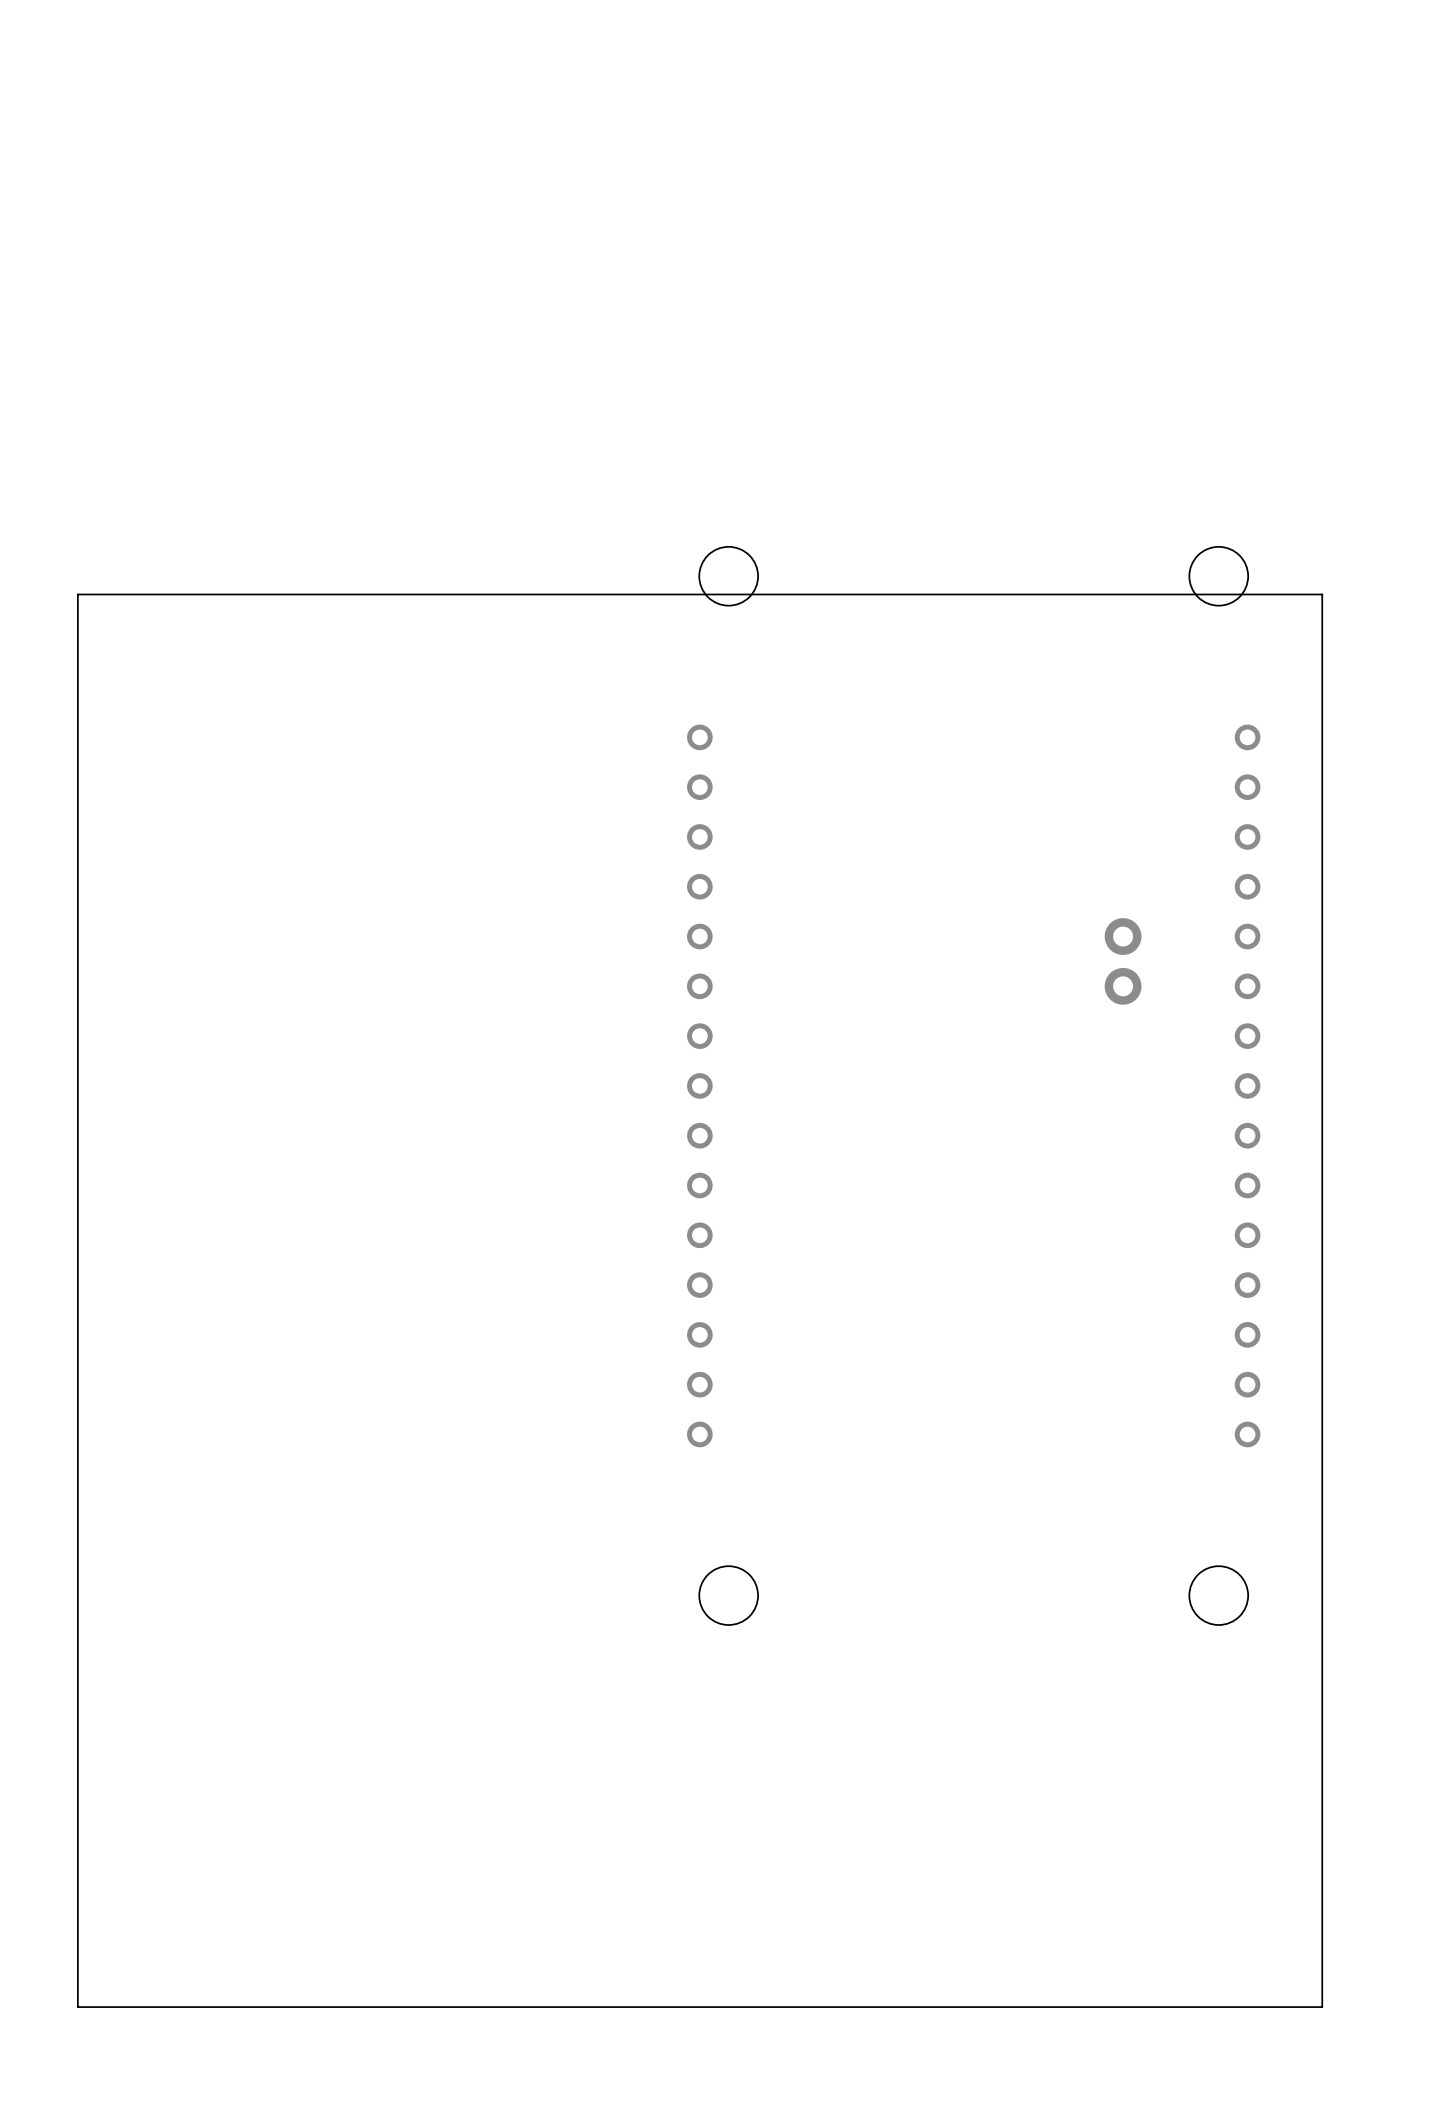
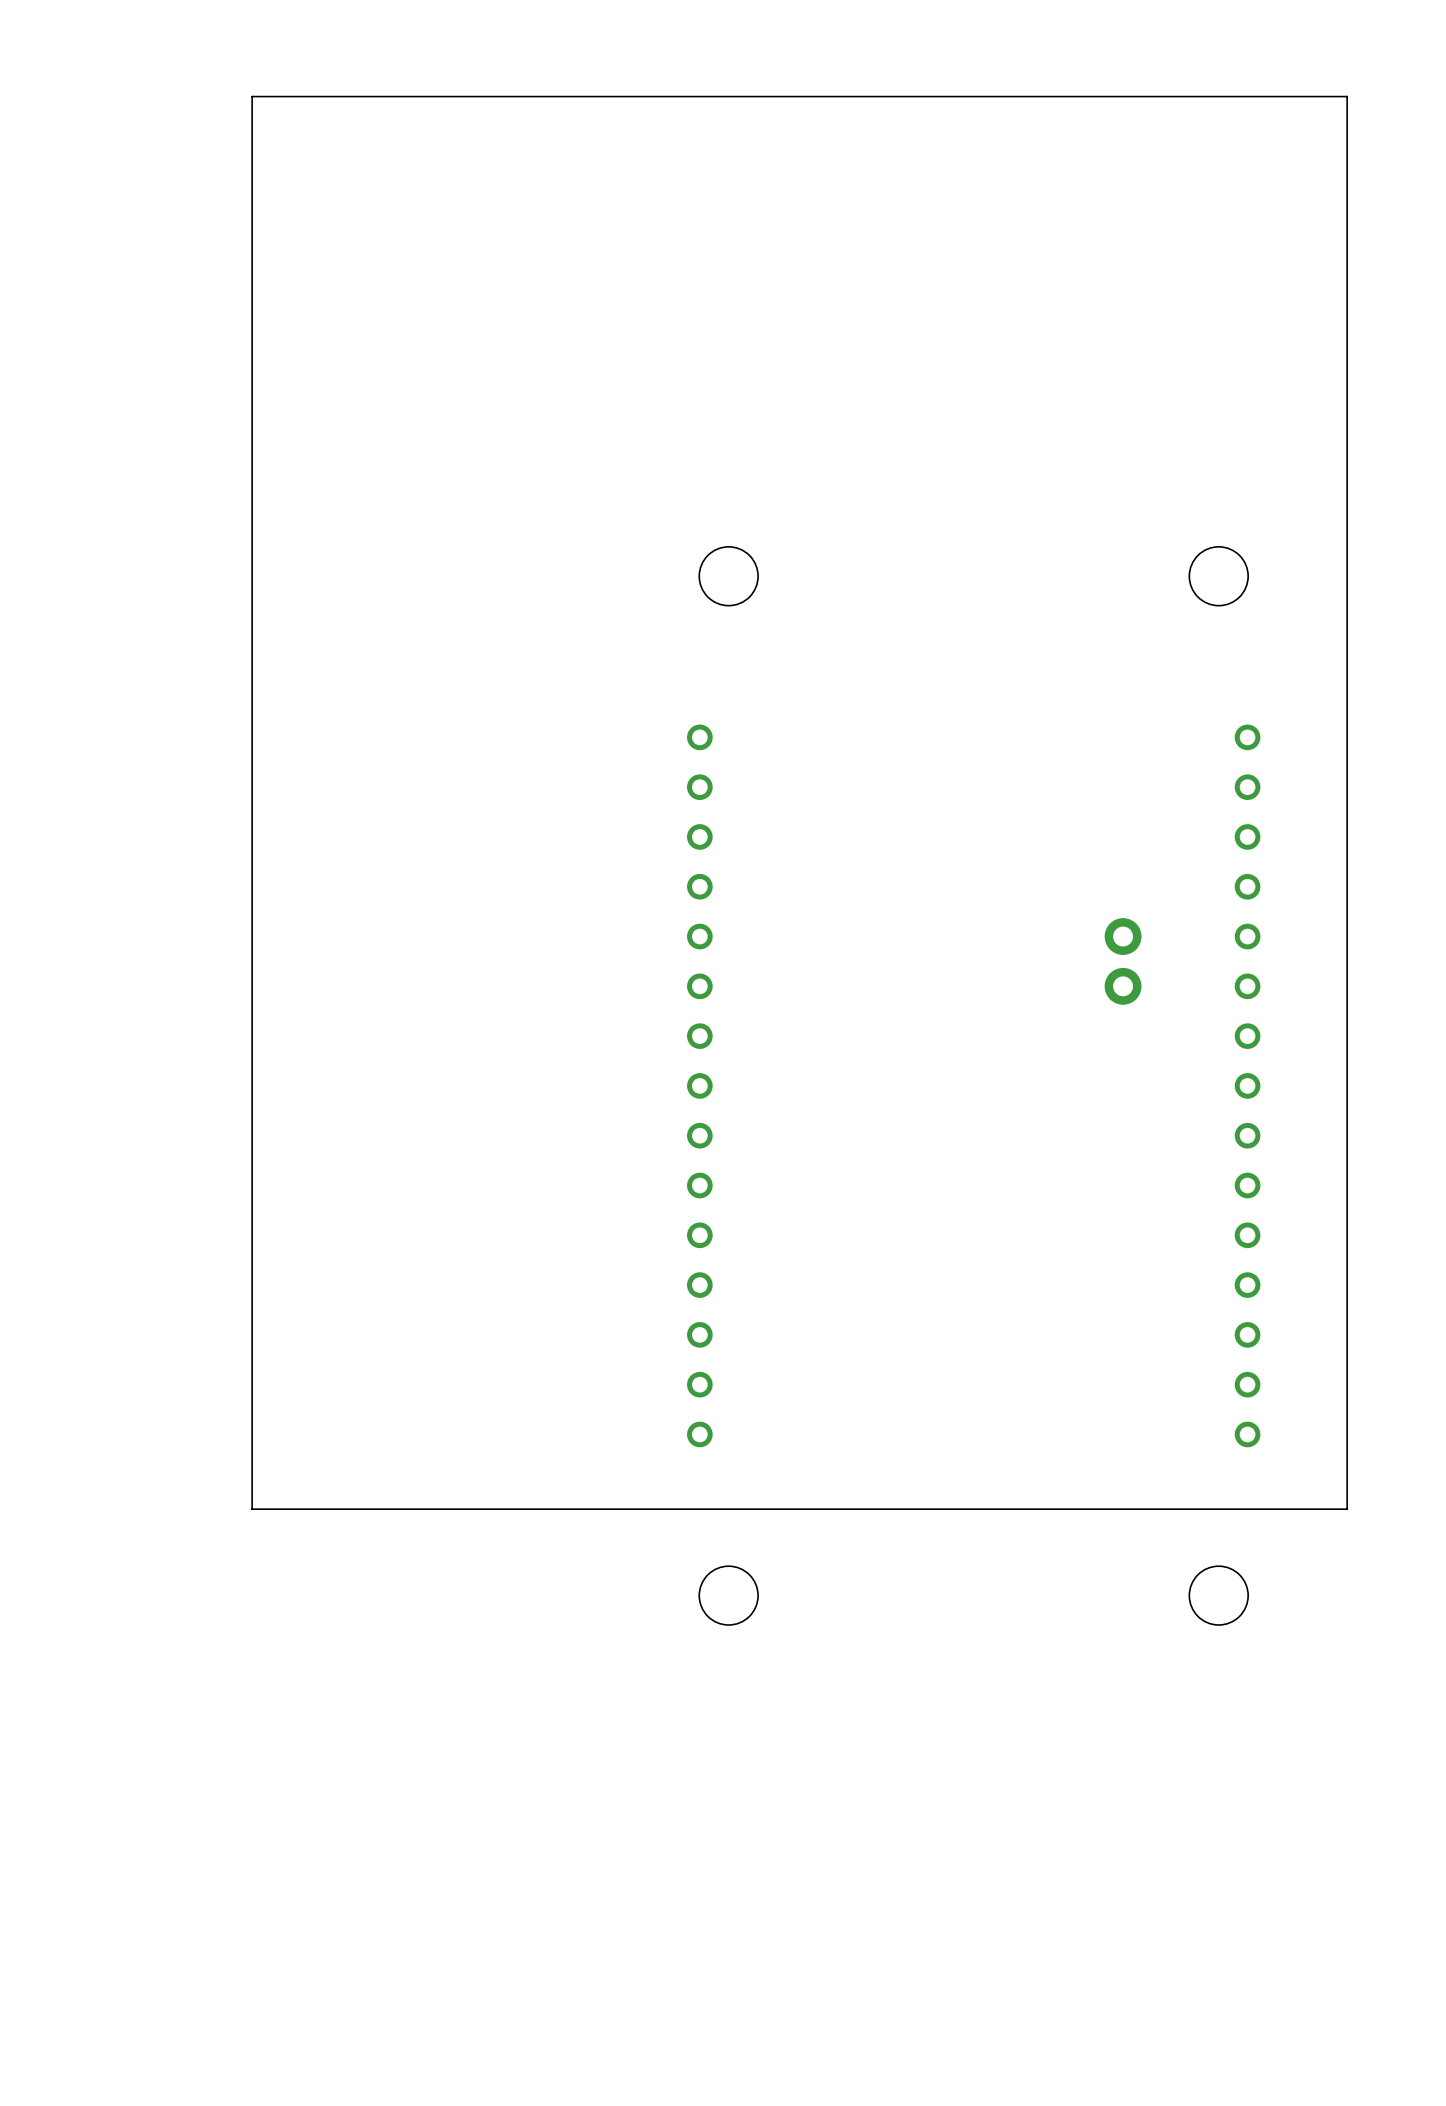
board edge: none -> (1347, 96) (252, 96) (252, 1509) (1347, 1509) (1347, 96)
board edge: (1322, 594) (77, 594) (77, 2007) (1322, 2007) (1322, 594) -> none

